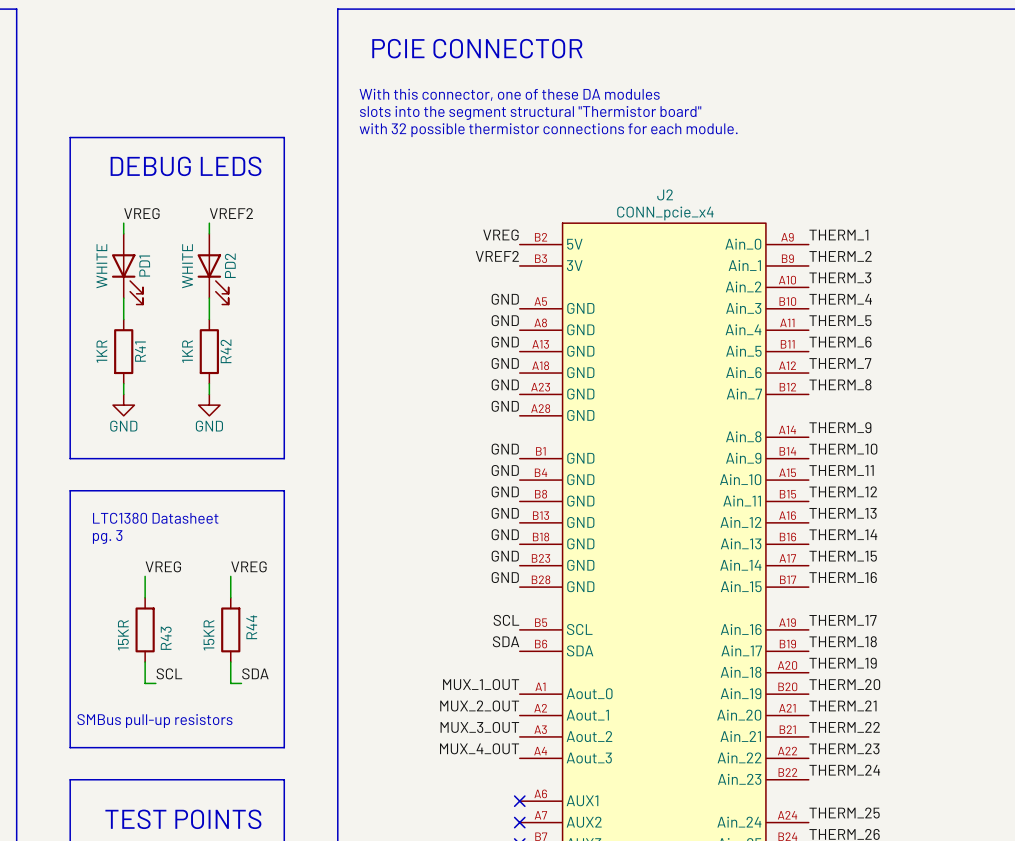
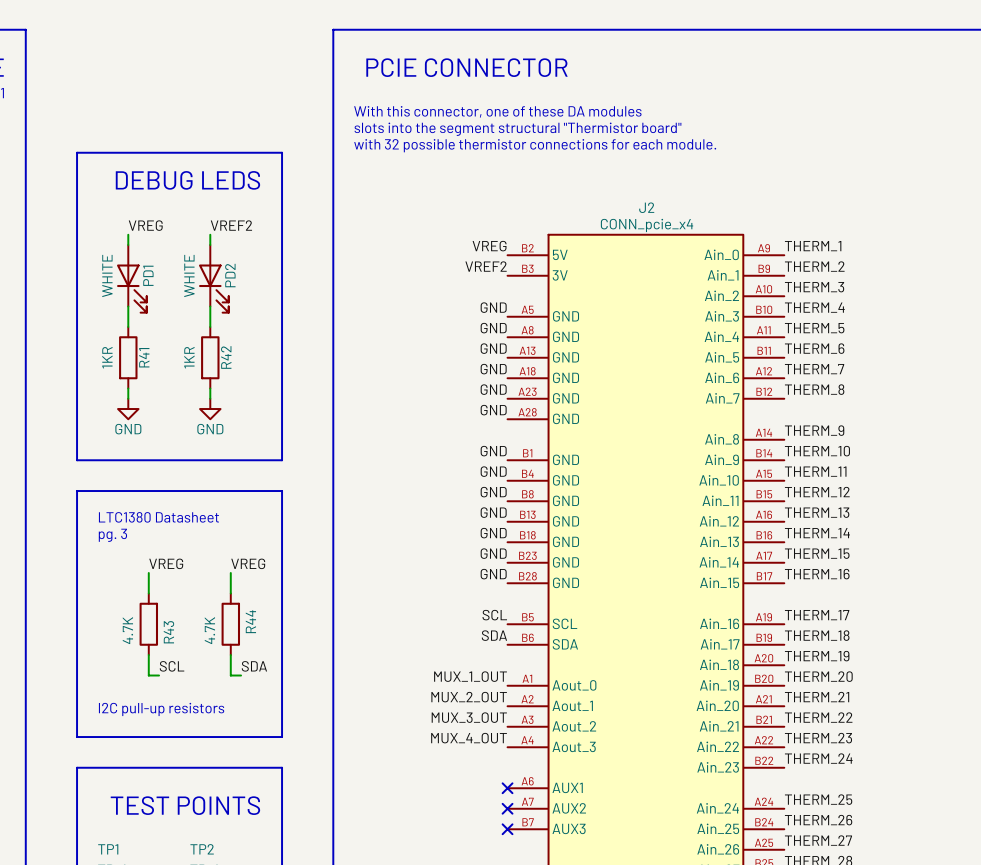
R43 value: 15KR (123, 635) -> 4.7K (127, 630)
R44 value: 15KR (209, 635) -> 4.7K (209, 630)
text: SMBus pull-up resistors (154, 721) -> I2C pull-up resistors (161, 709)

